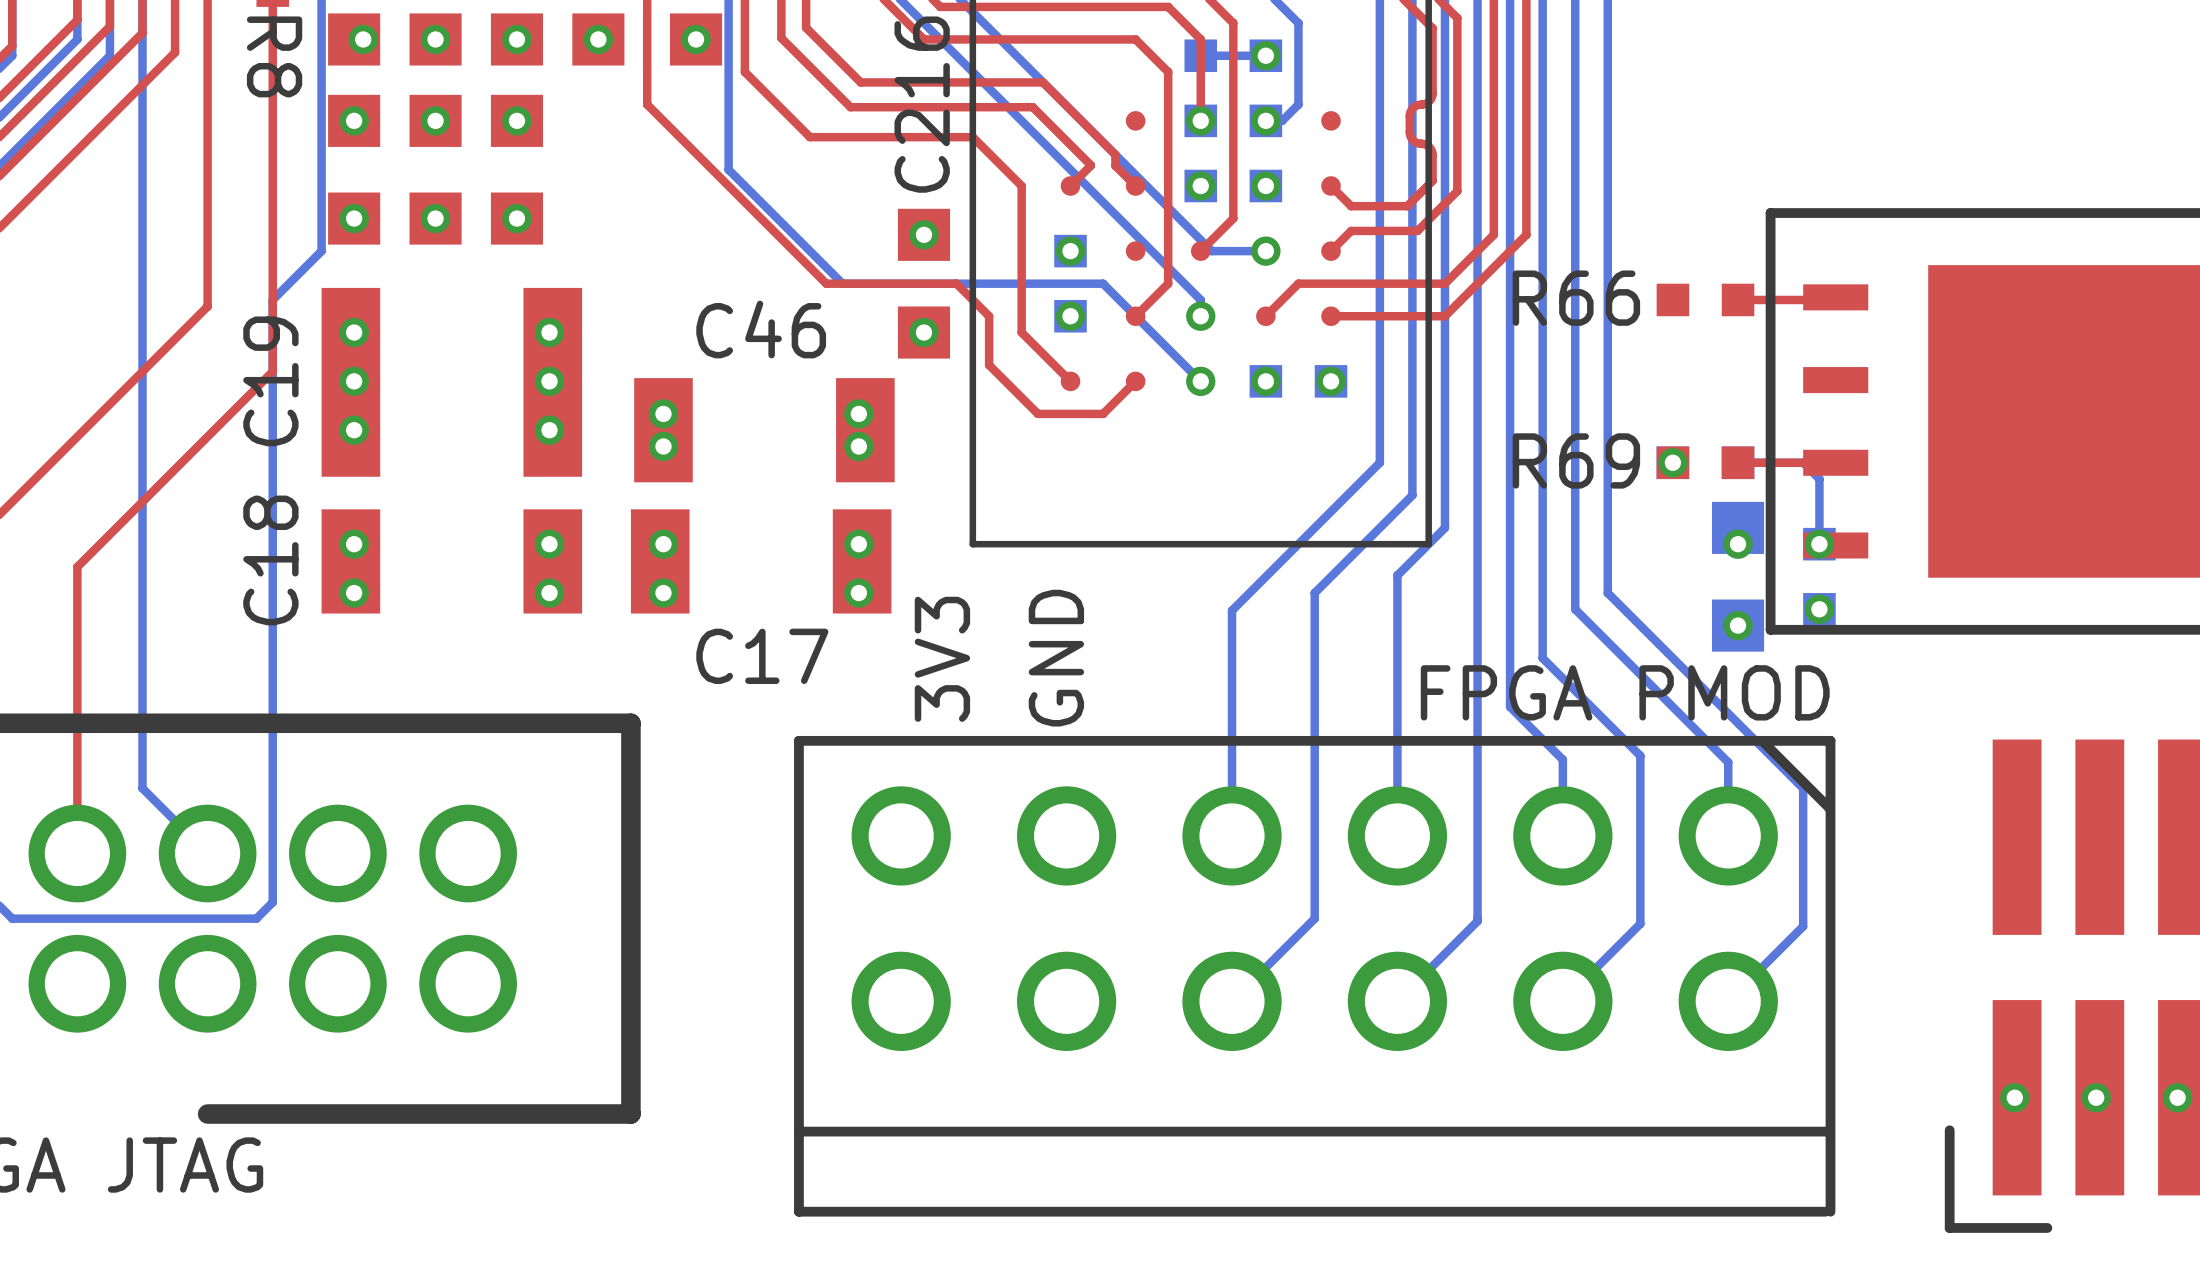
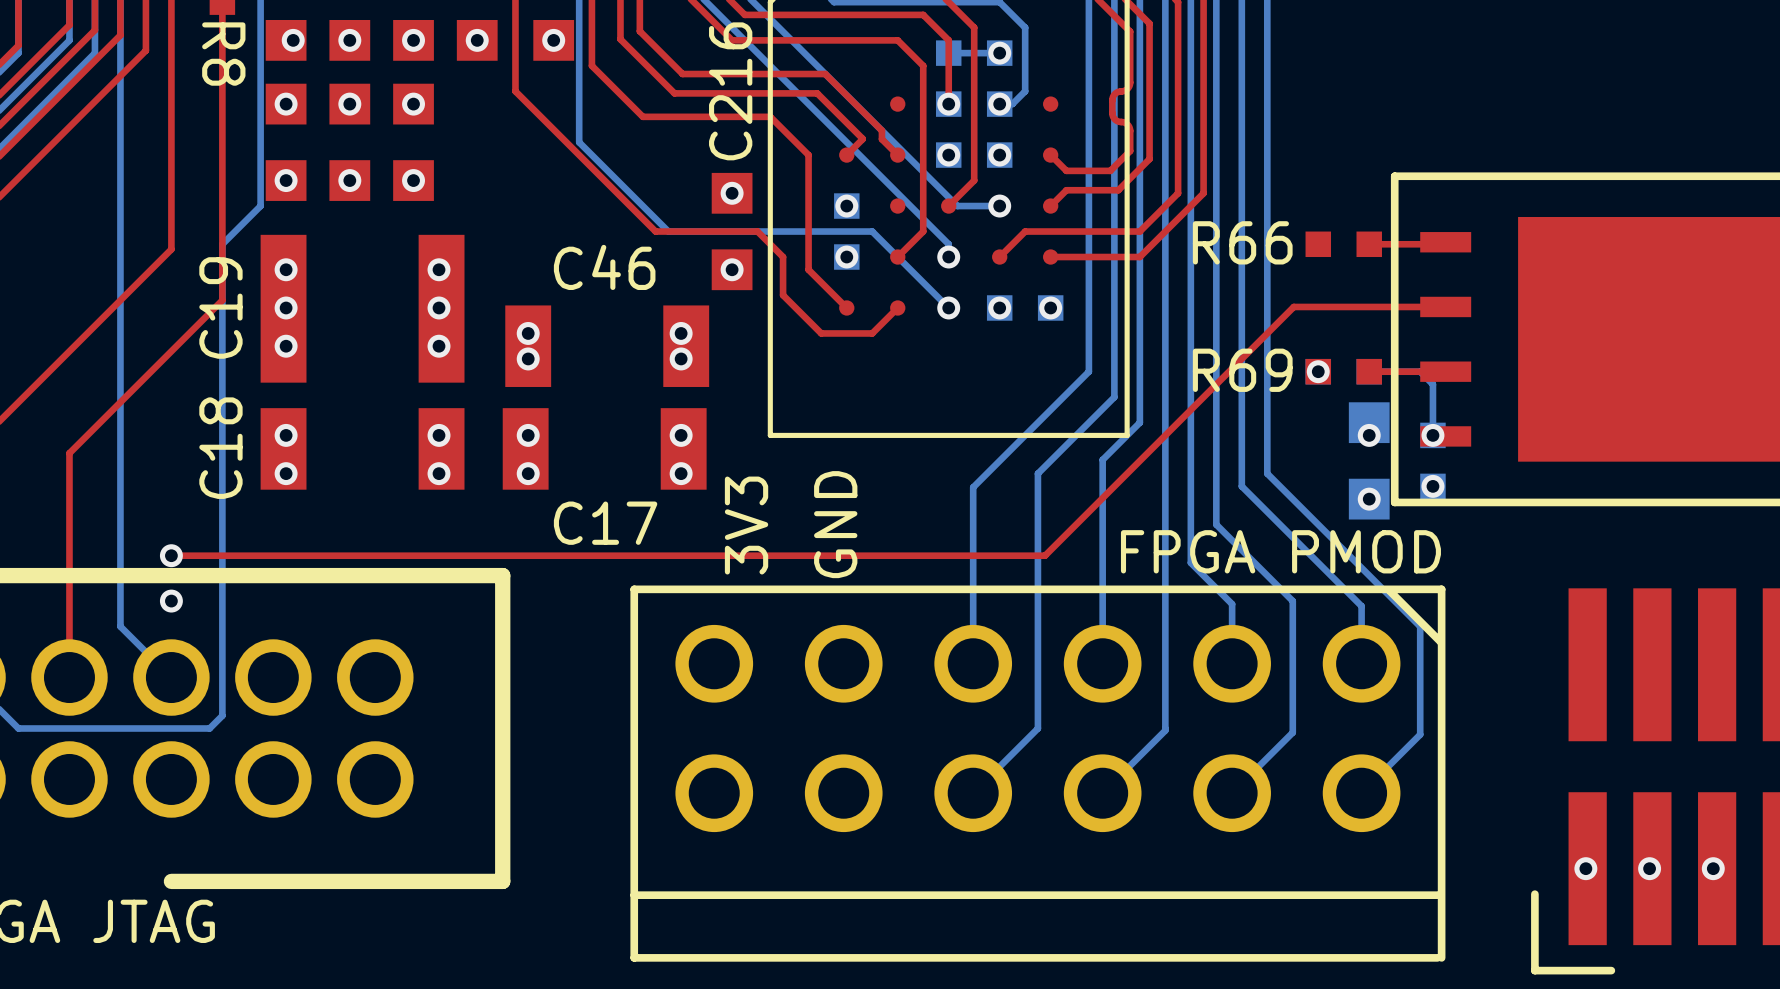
top track: none -> (1445, 306) (1293, 306) (1045, 555) (171, 555)
via: none -> (171, 555)
via: none -> (171, 601)

